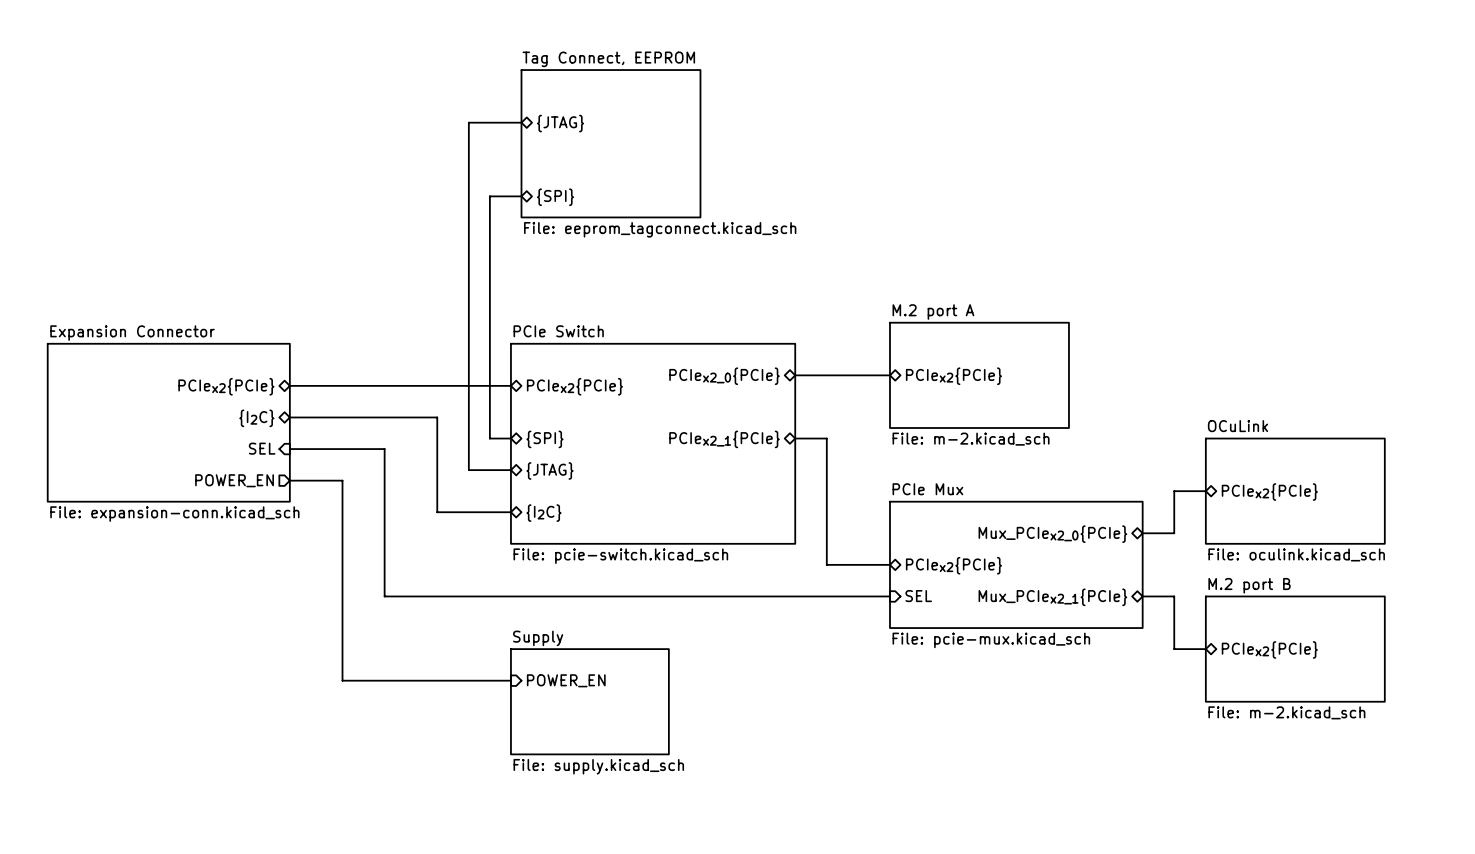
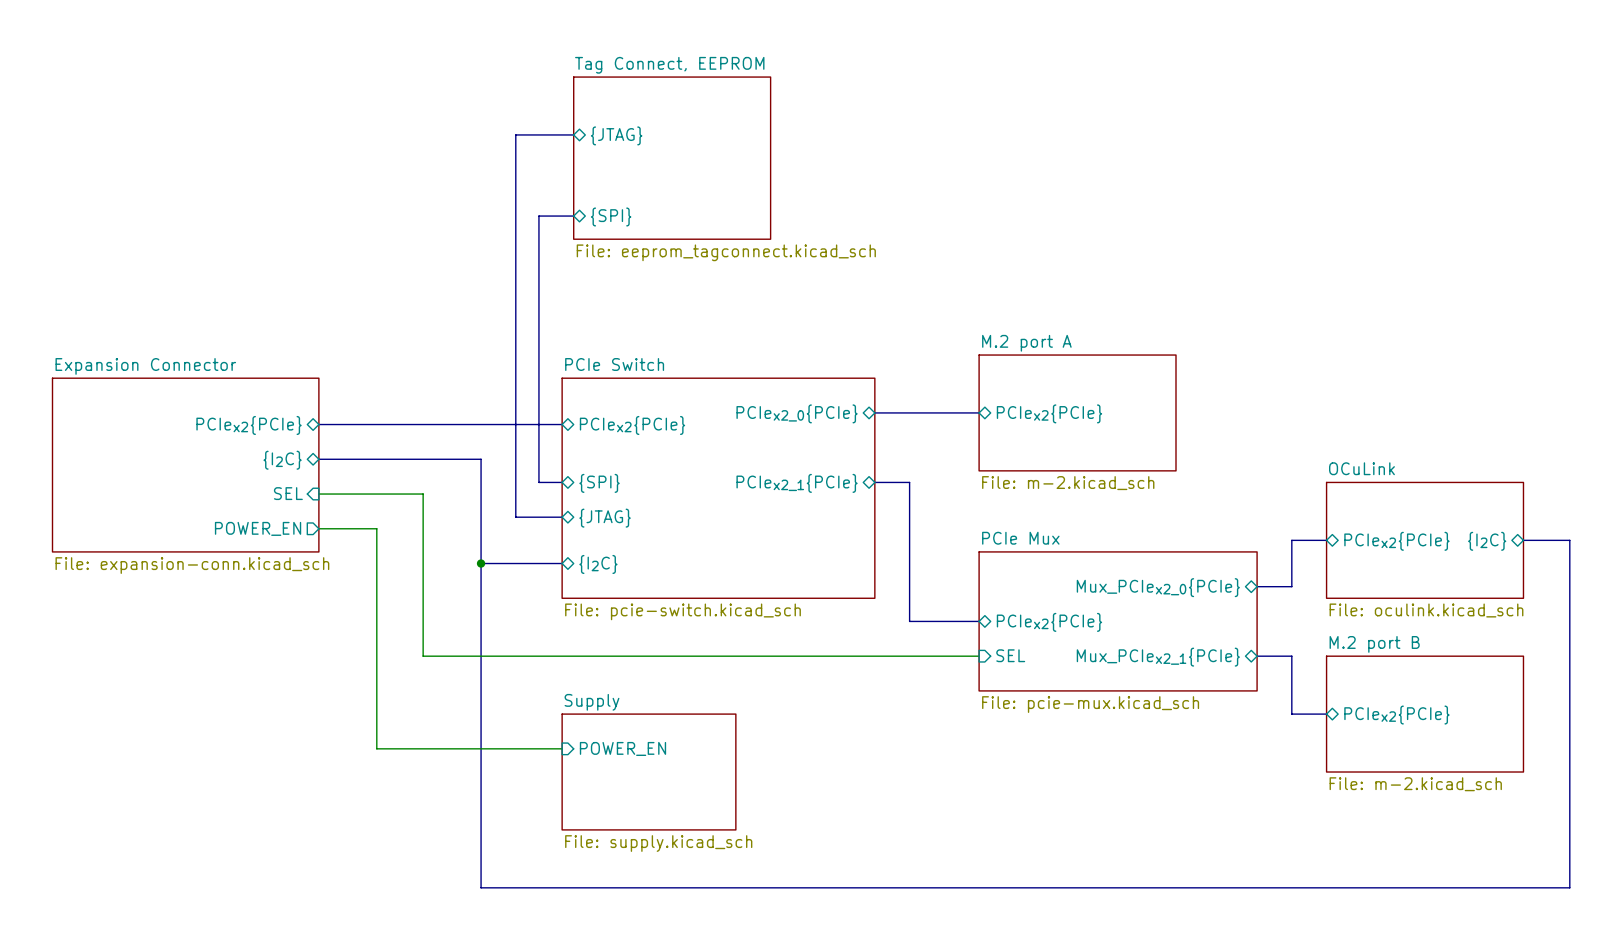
bus: none -> (1523, 540) (1569, 540) (1569, 887) (481, 887) (481, 563)
sheet pin: none -> {I2C} (1487, 541)
junction: none -> (481, 563)

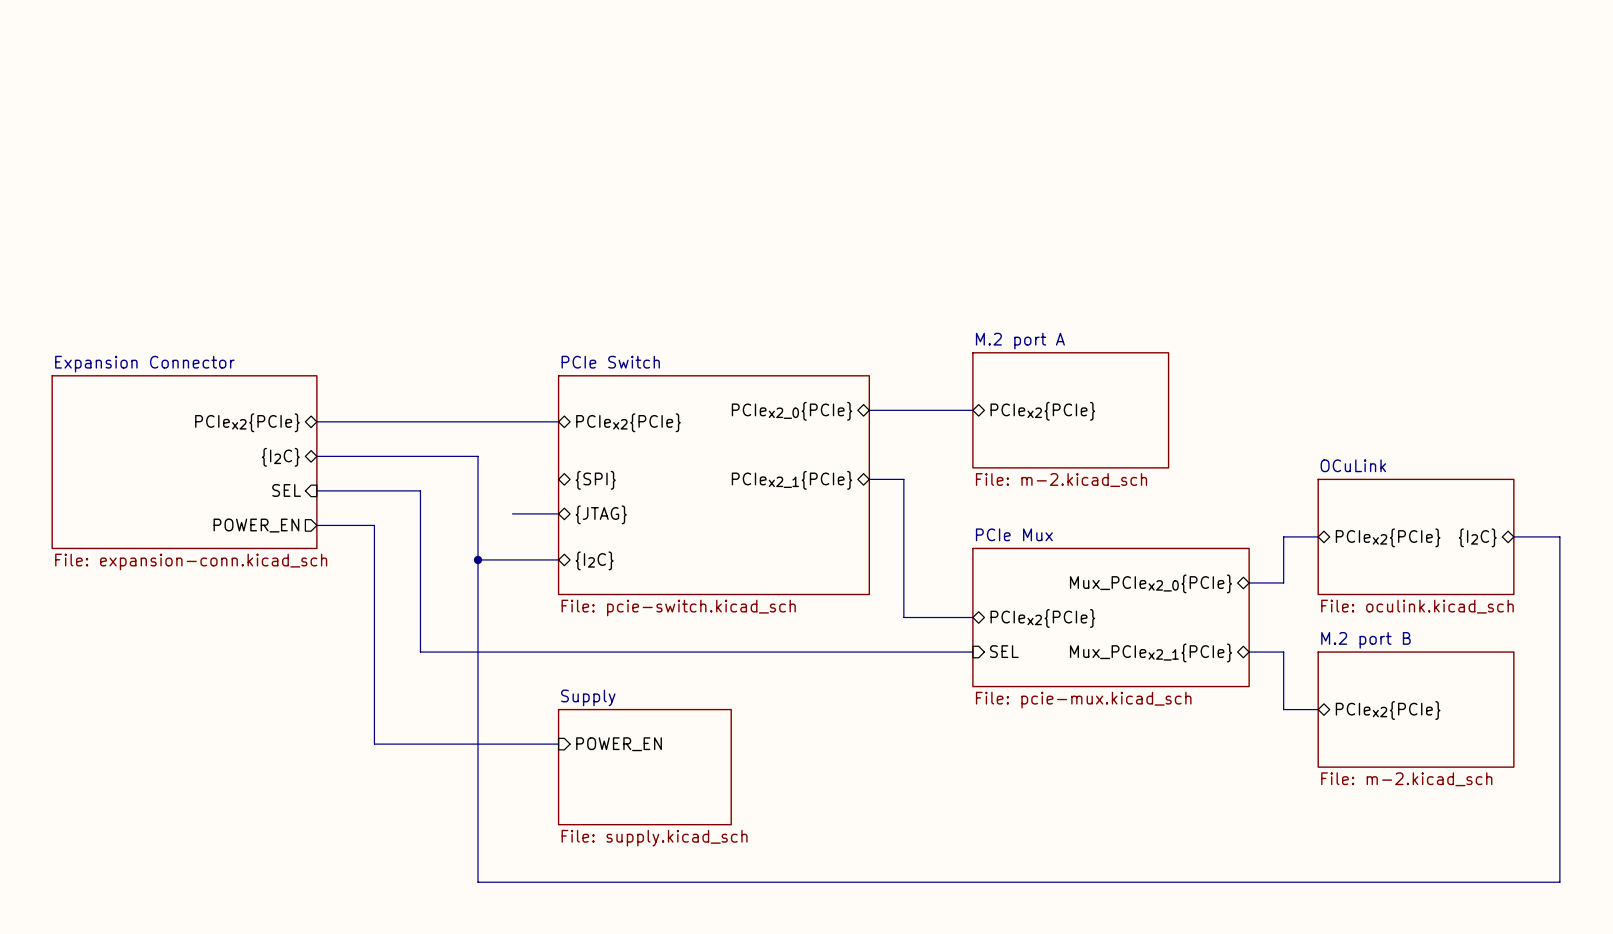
bus: (573, 134) (515, 134) (515, 517) -> none
sheet pin: {JTAG} (616, 135) -> none
sheet Tag Connect, EEPROM: File: eeprom_tagconnect.kicad_sch (672, 158) -> none
bus: (573, 216) (538, 216) (538, 482) (562, 482) -> none
sheet pin: {SPI} (611, 216) -> none

